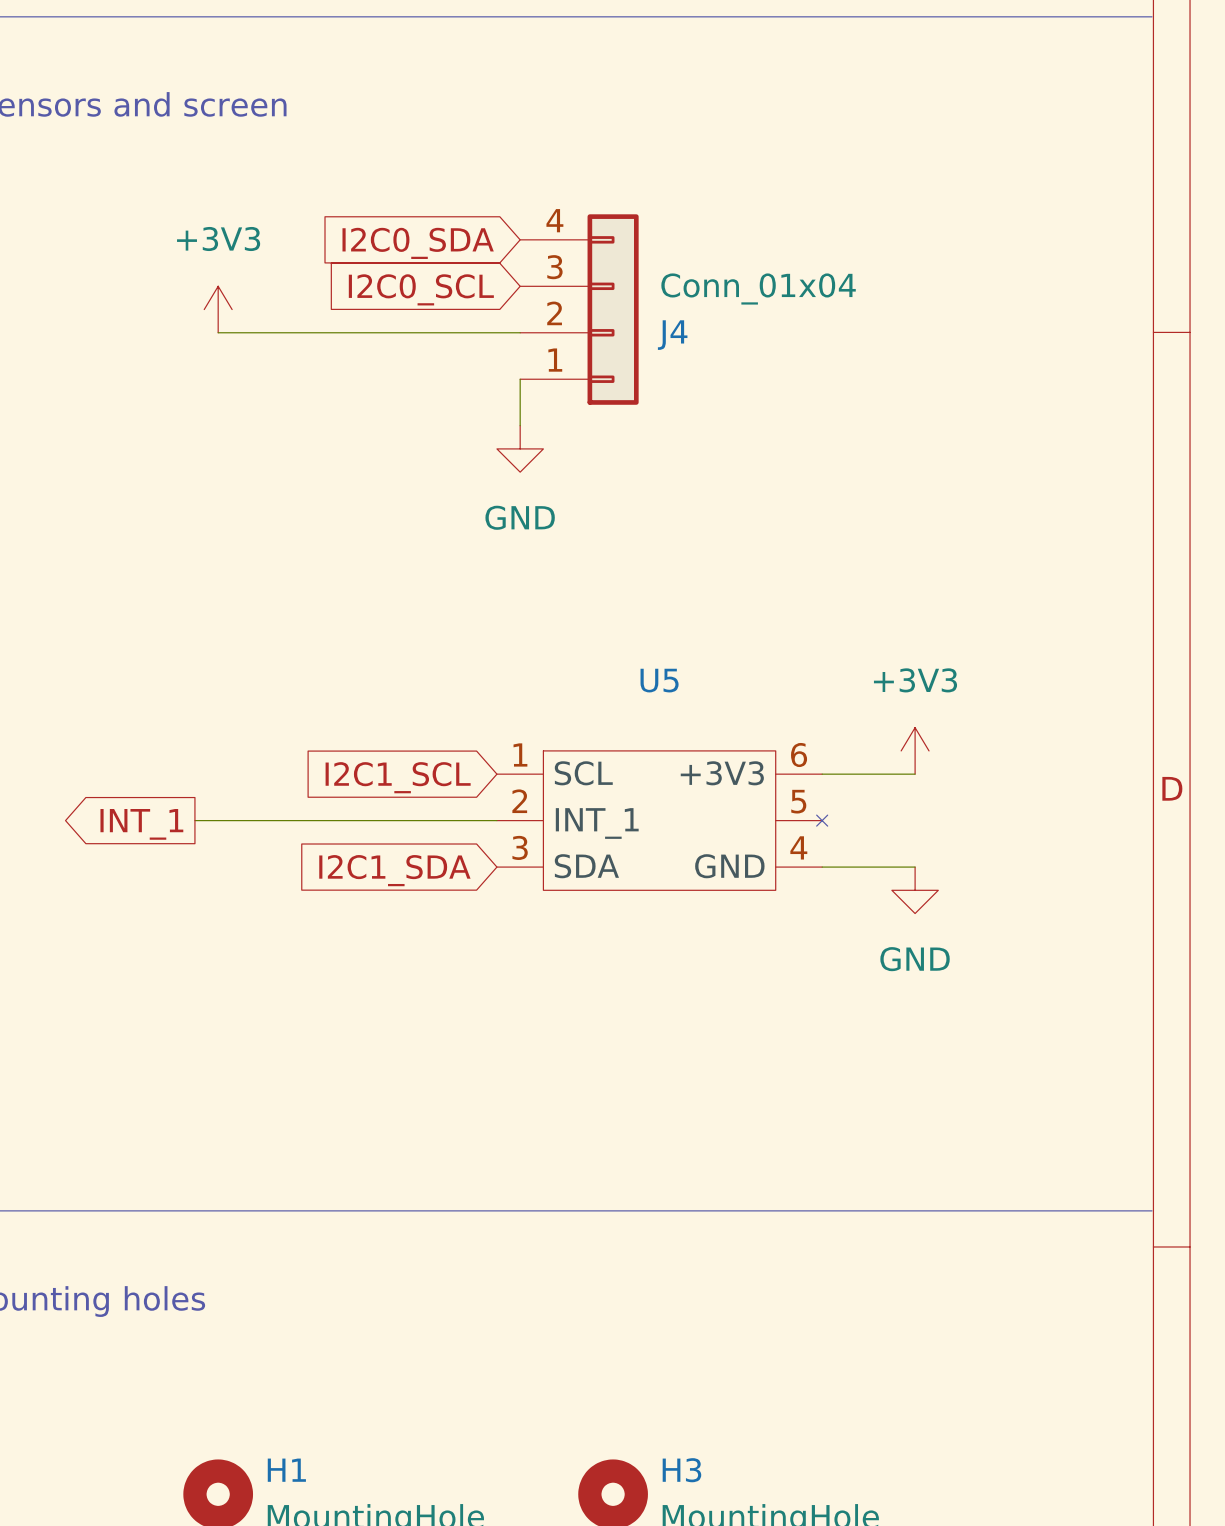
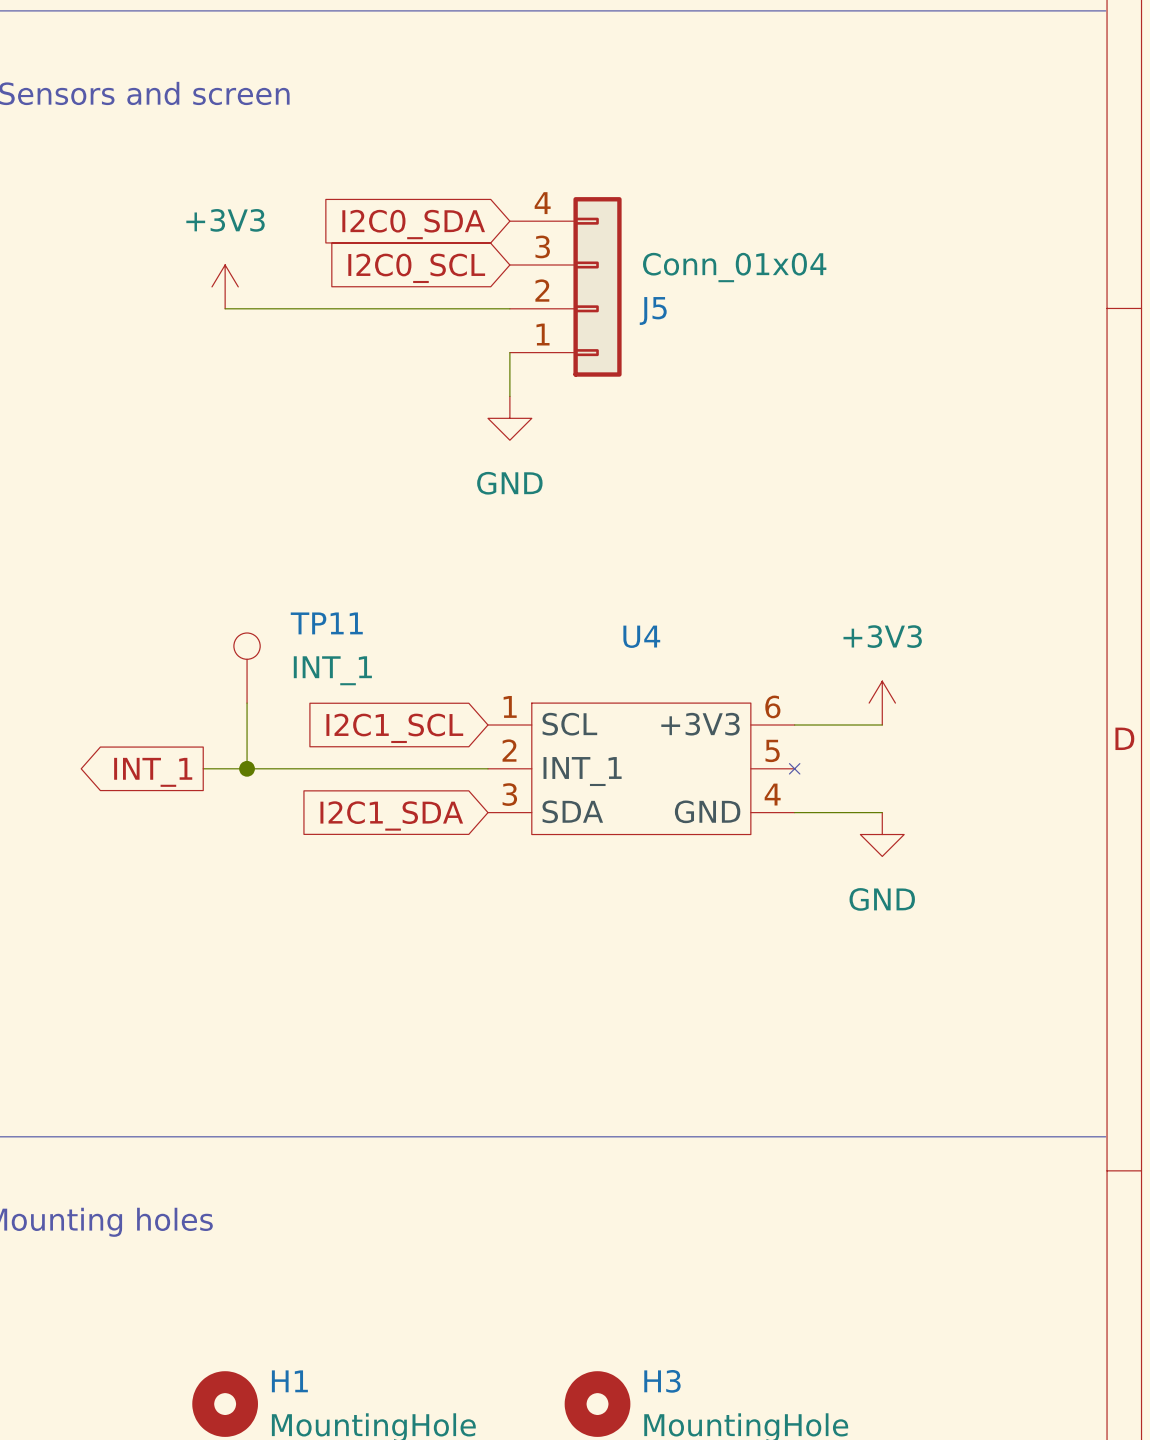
J4 name: J4 (672, 335) -> J5 (653, 310)
U5 name: U5 (659, 680) -> U4 (641, 636)
TP11: none -> INT_1 (247, 668)
wire: none -> (247, 703) (247, 768)
junction: none -> (247, 768)

